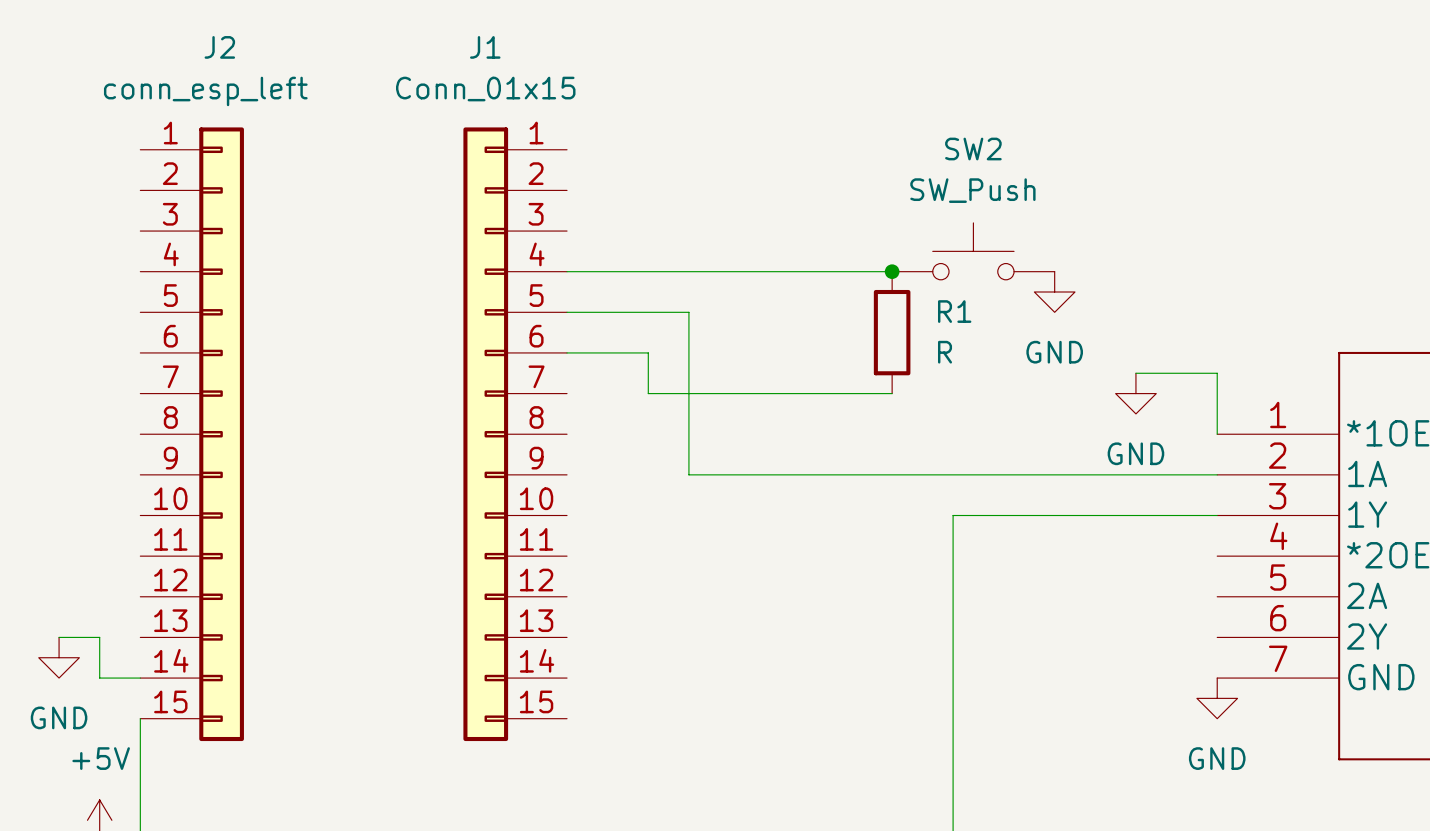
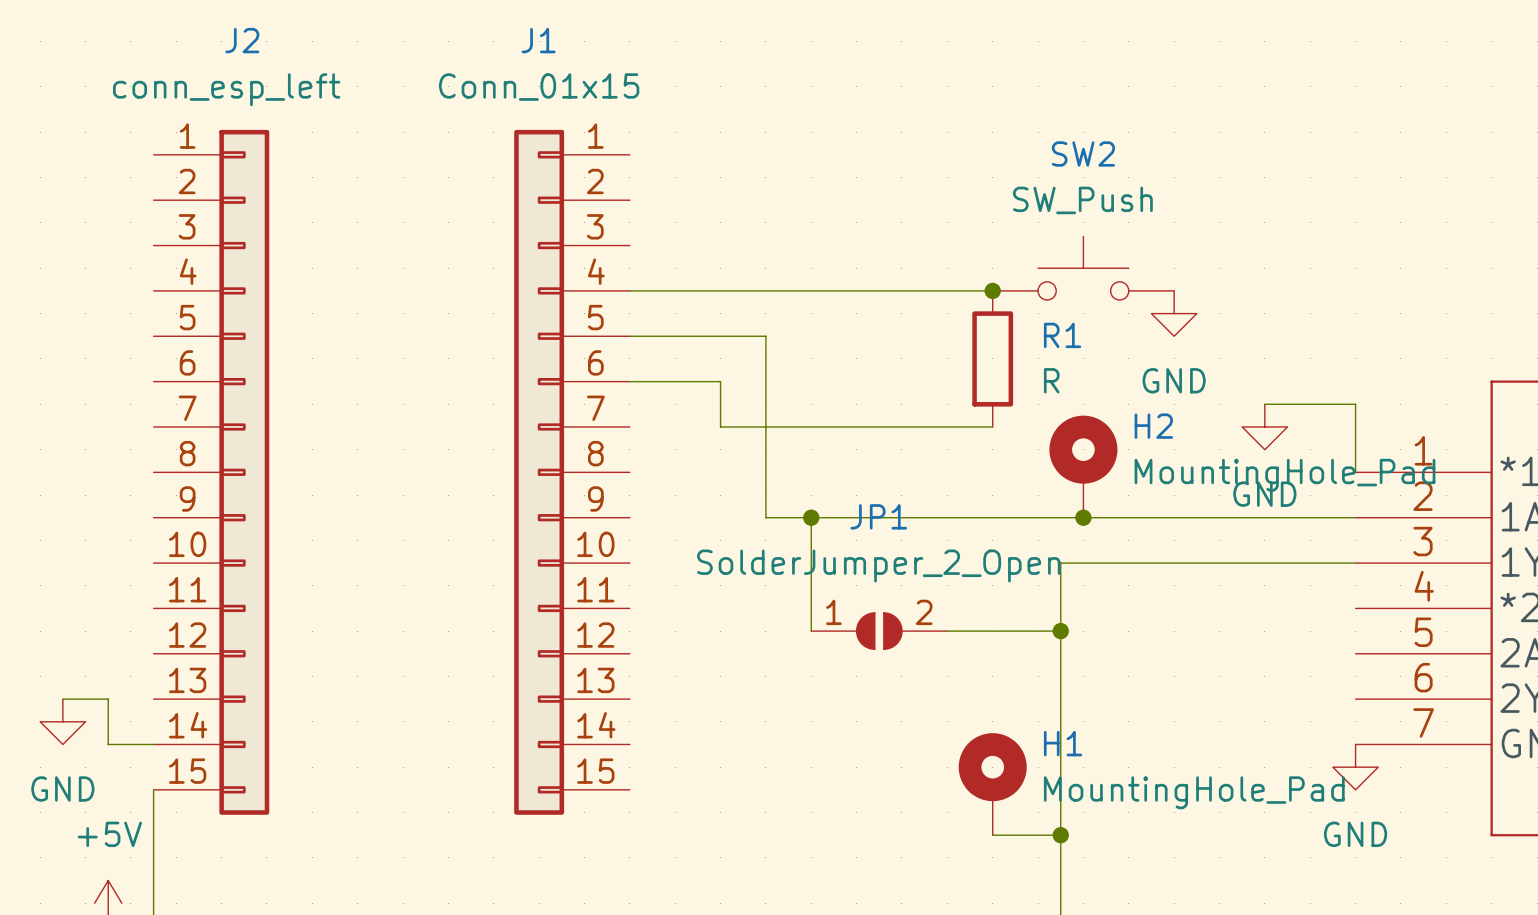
H2: none -> MountingHole_Pad (1083, 466)
wire: none -> (811, 517) (811, 631)
junction: none -> (811, 517)
junction: none -> (1083, 517)
JP1: none -> SolderJumper_2_Open (879, 631)
wire: none -> (947, 631) (1060, 631)
junction: none -> (1060, 631)
H1: none -> MountingHole_Pad (992, 784)
wire: none -> (992, 835) (1060, 835)
junction: none -> (1060, 835)

